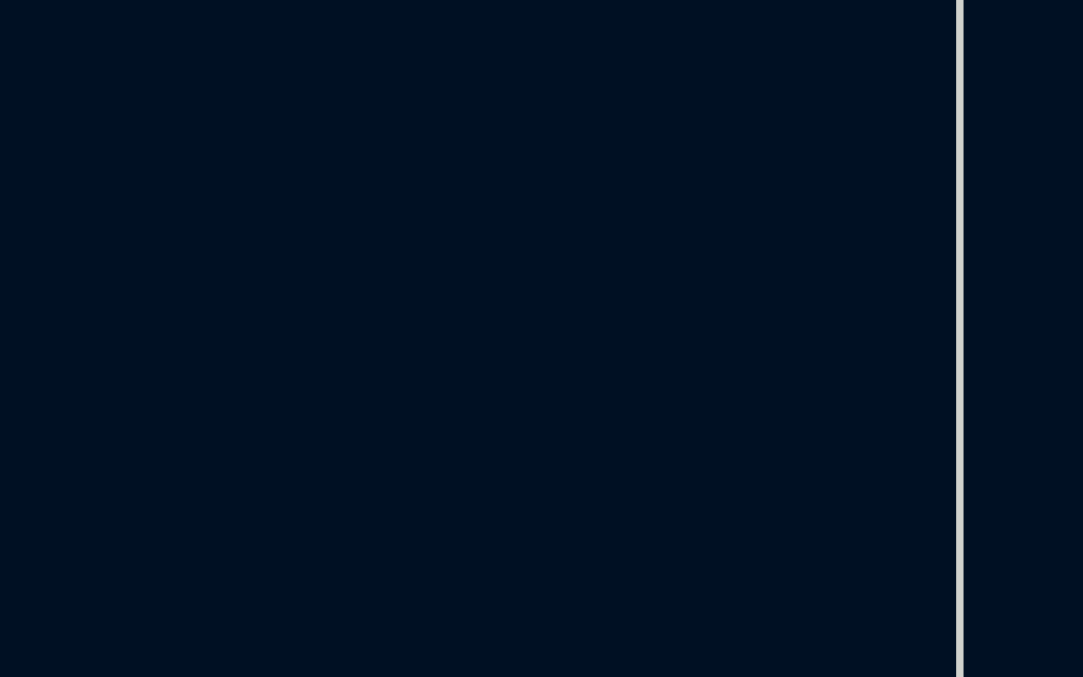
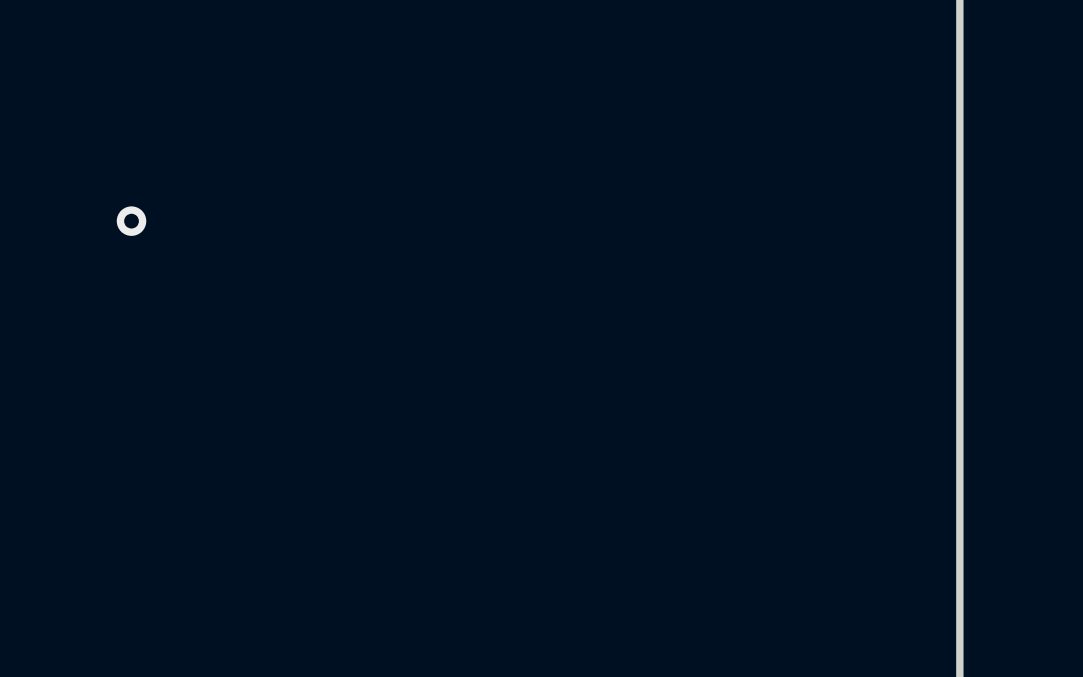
via: none -> (131, 221)

